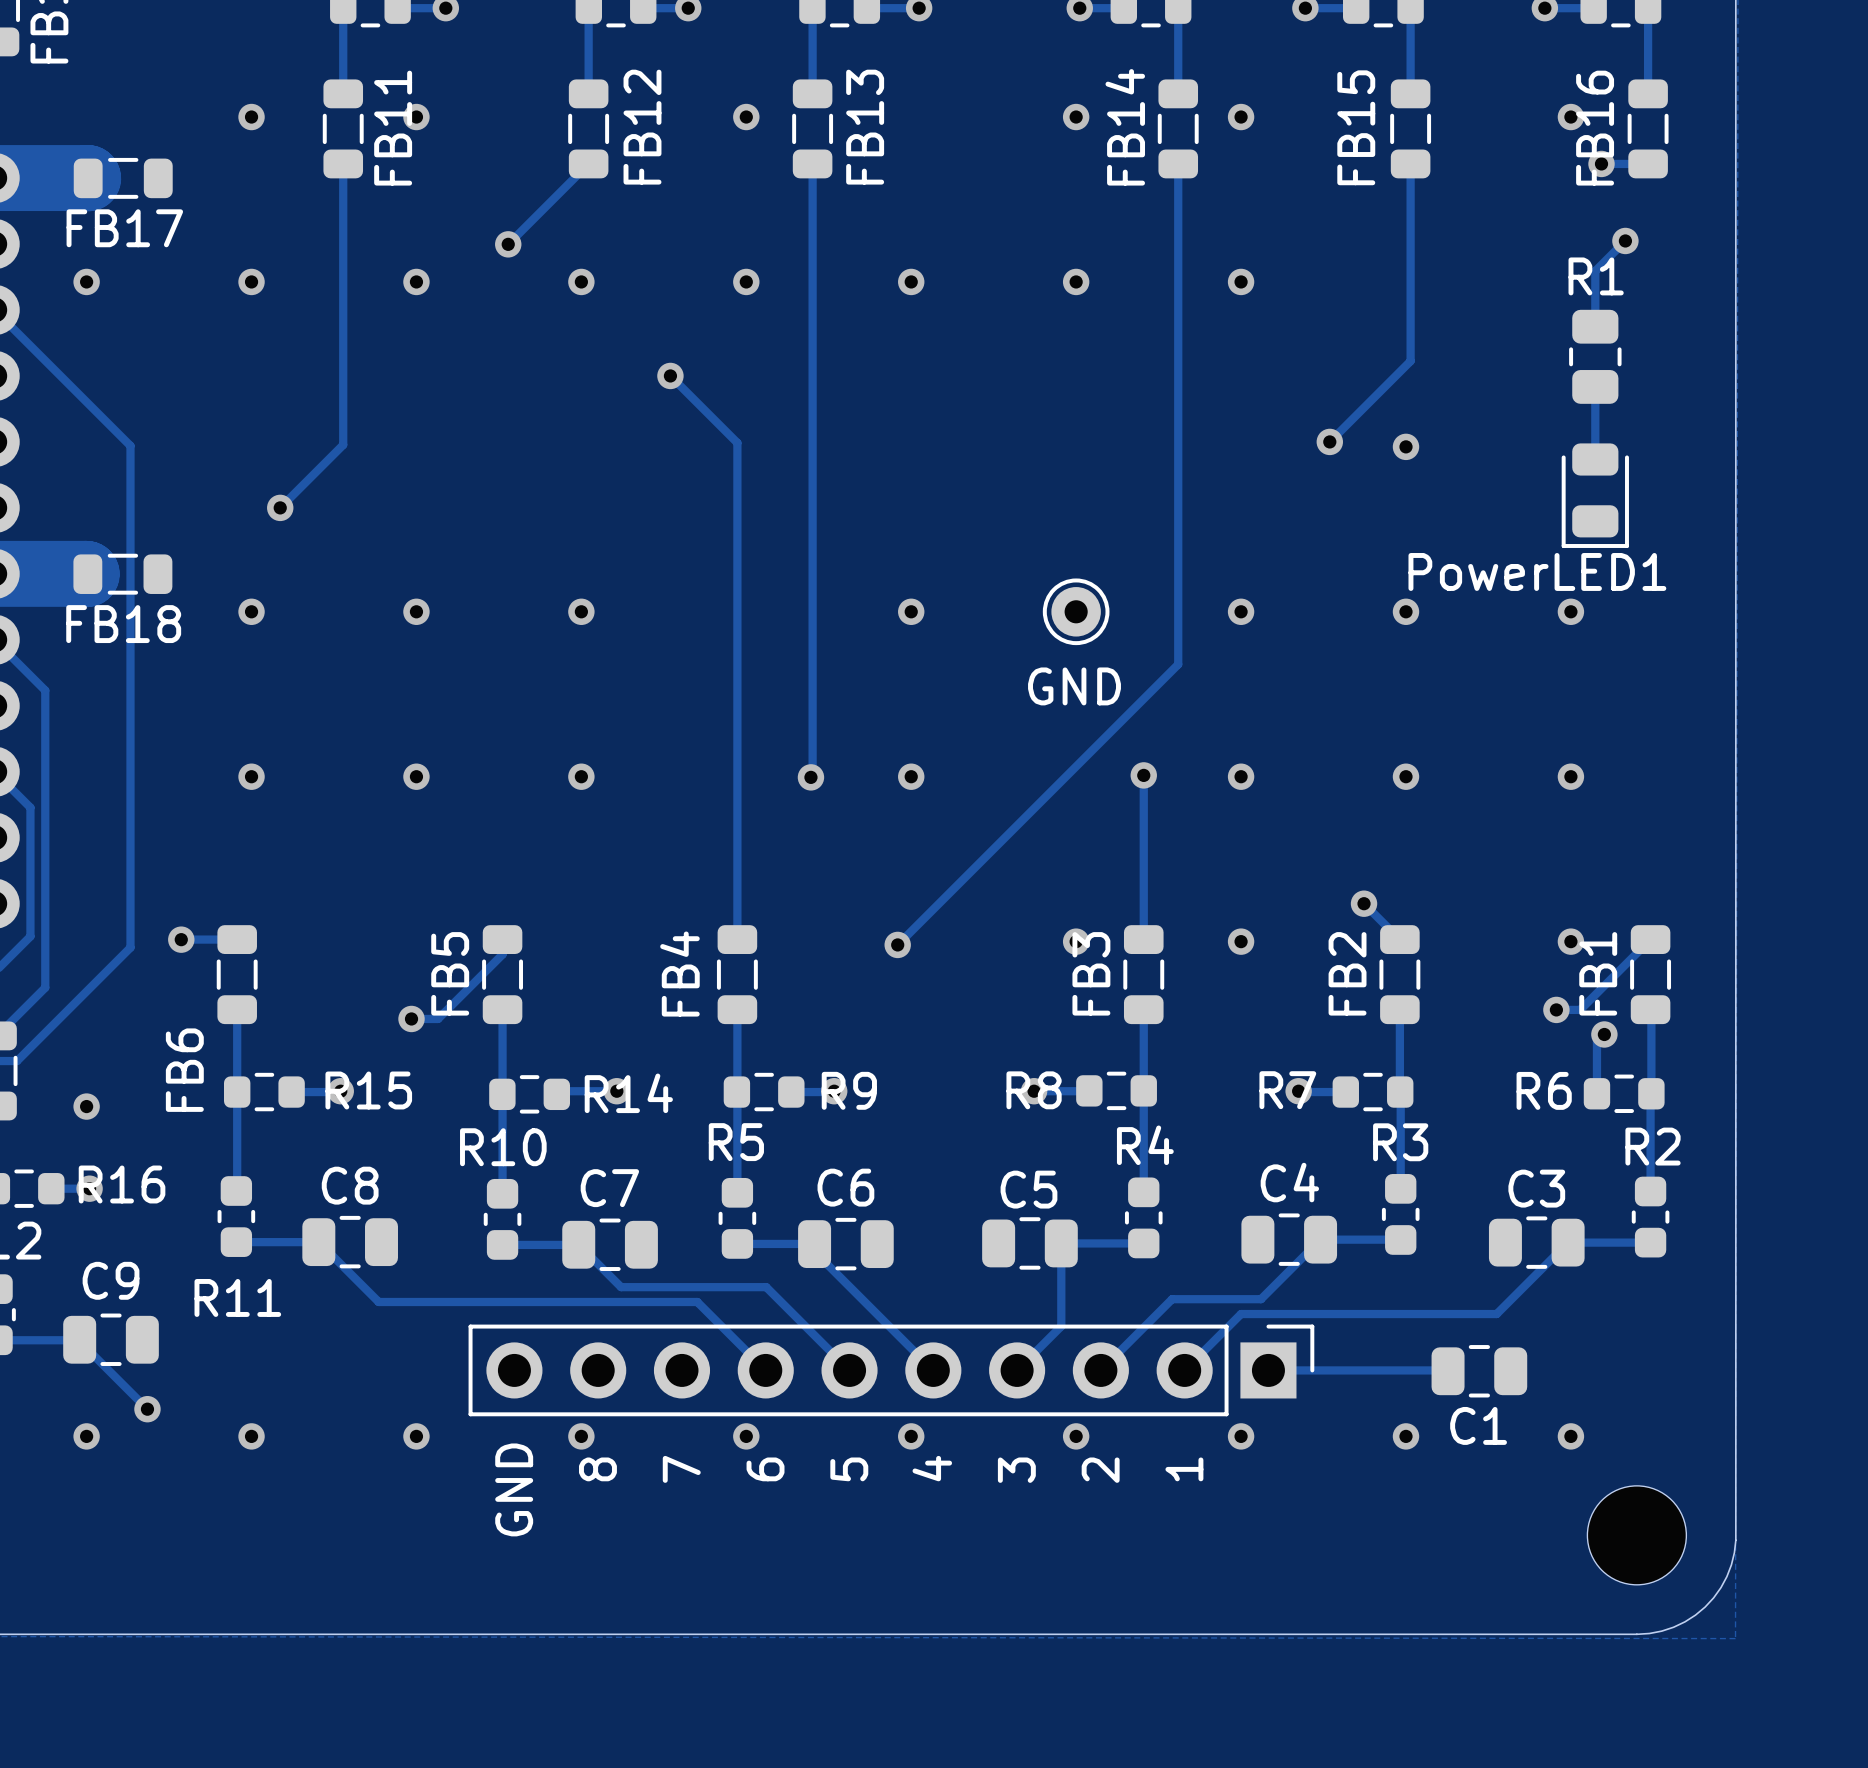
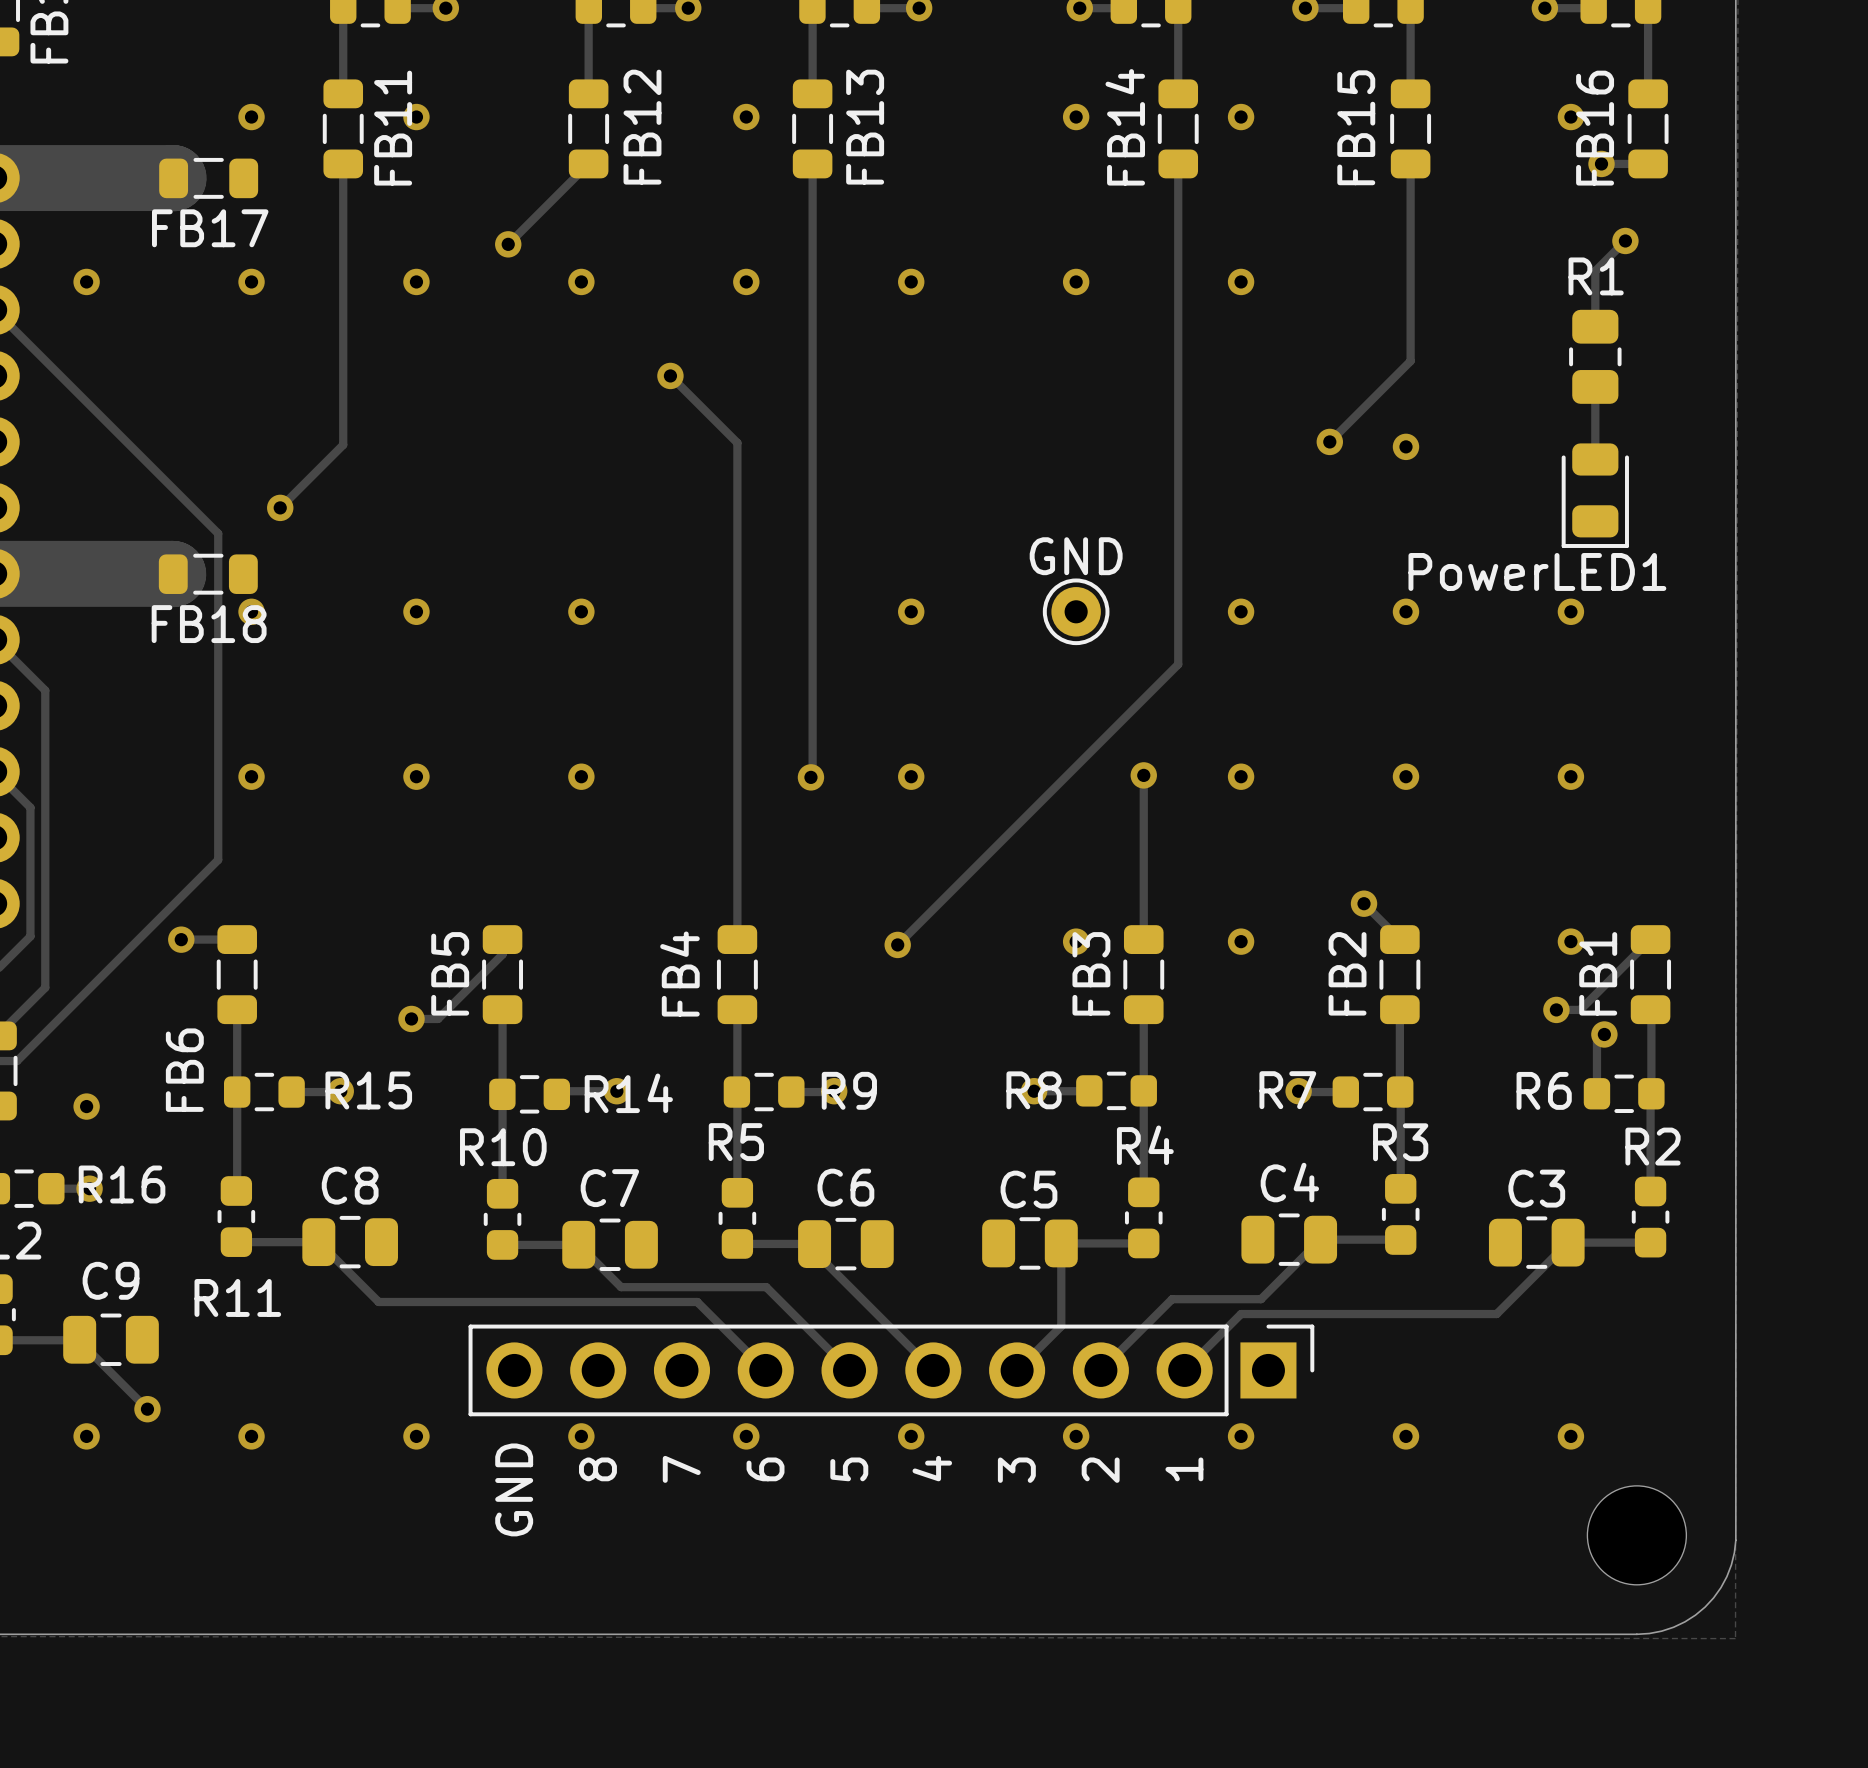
track: none -> (87, 178) (173, 178)
FB17 position: (123, 178) -> (208, 178)
track: (130, 445) (130, 947) -> (130, 445) (218, 533) (218, 859) (130, 947)
track: none -> (86, 573) (172, 573)
FB18 position: (122, 574) -> (208, 574)
GND name position: GND (1074, 686) -> GND (1076, 556)
track: (1268, 1370) (1448, 1371) -> none
C1: (1479, 1371) -> none

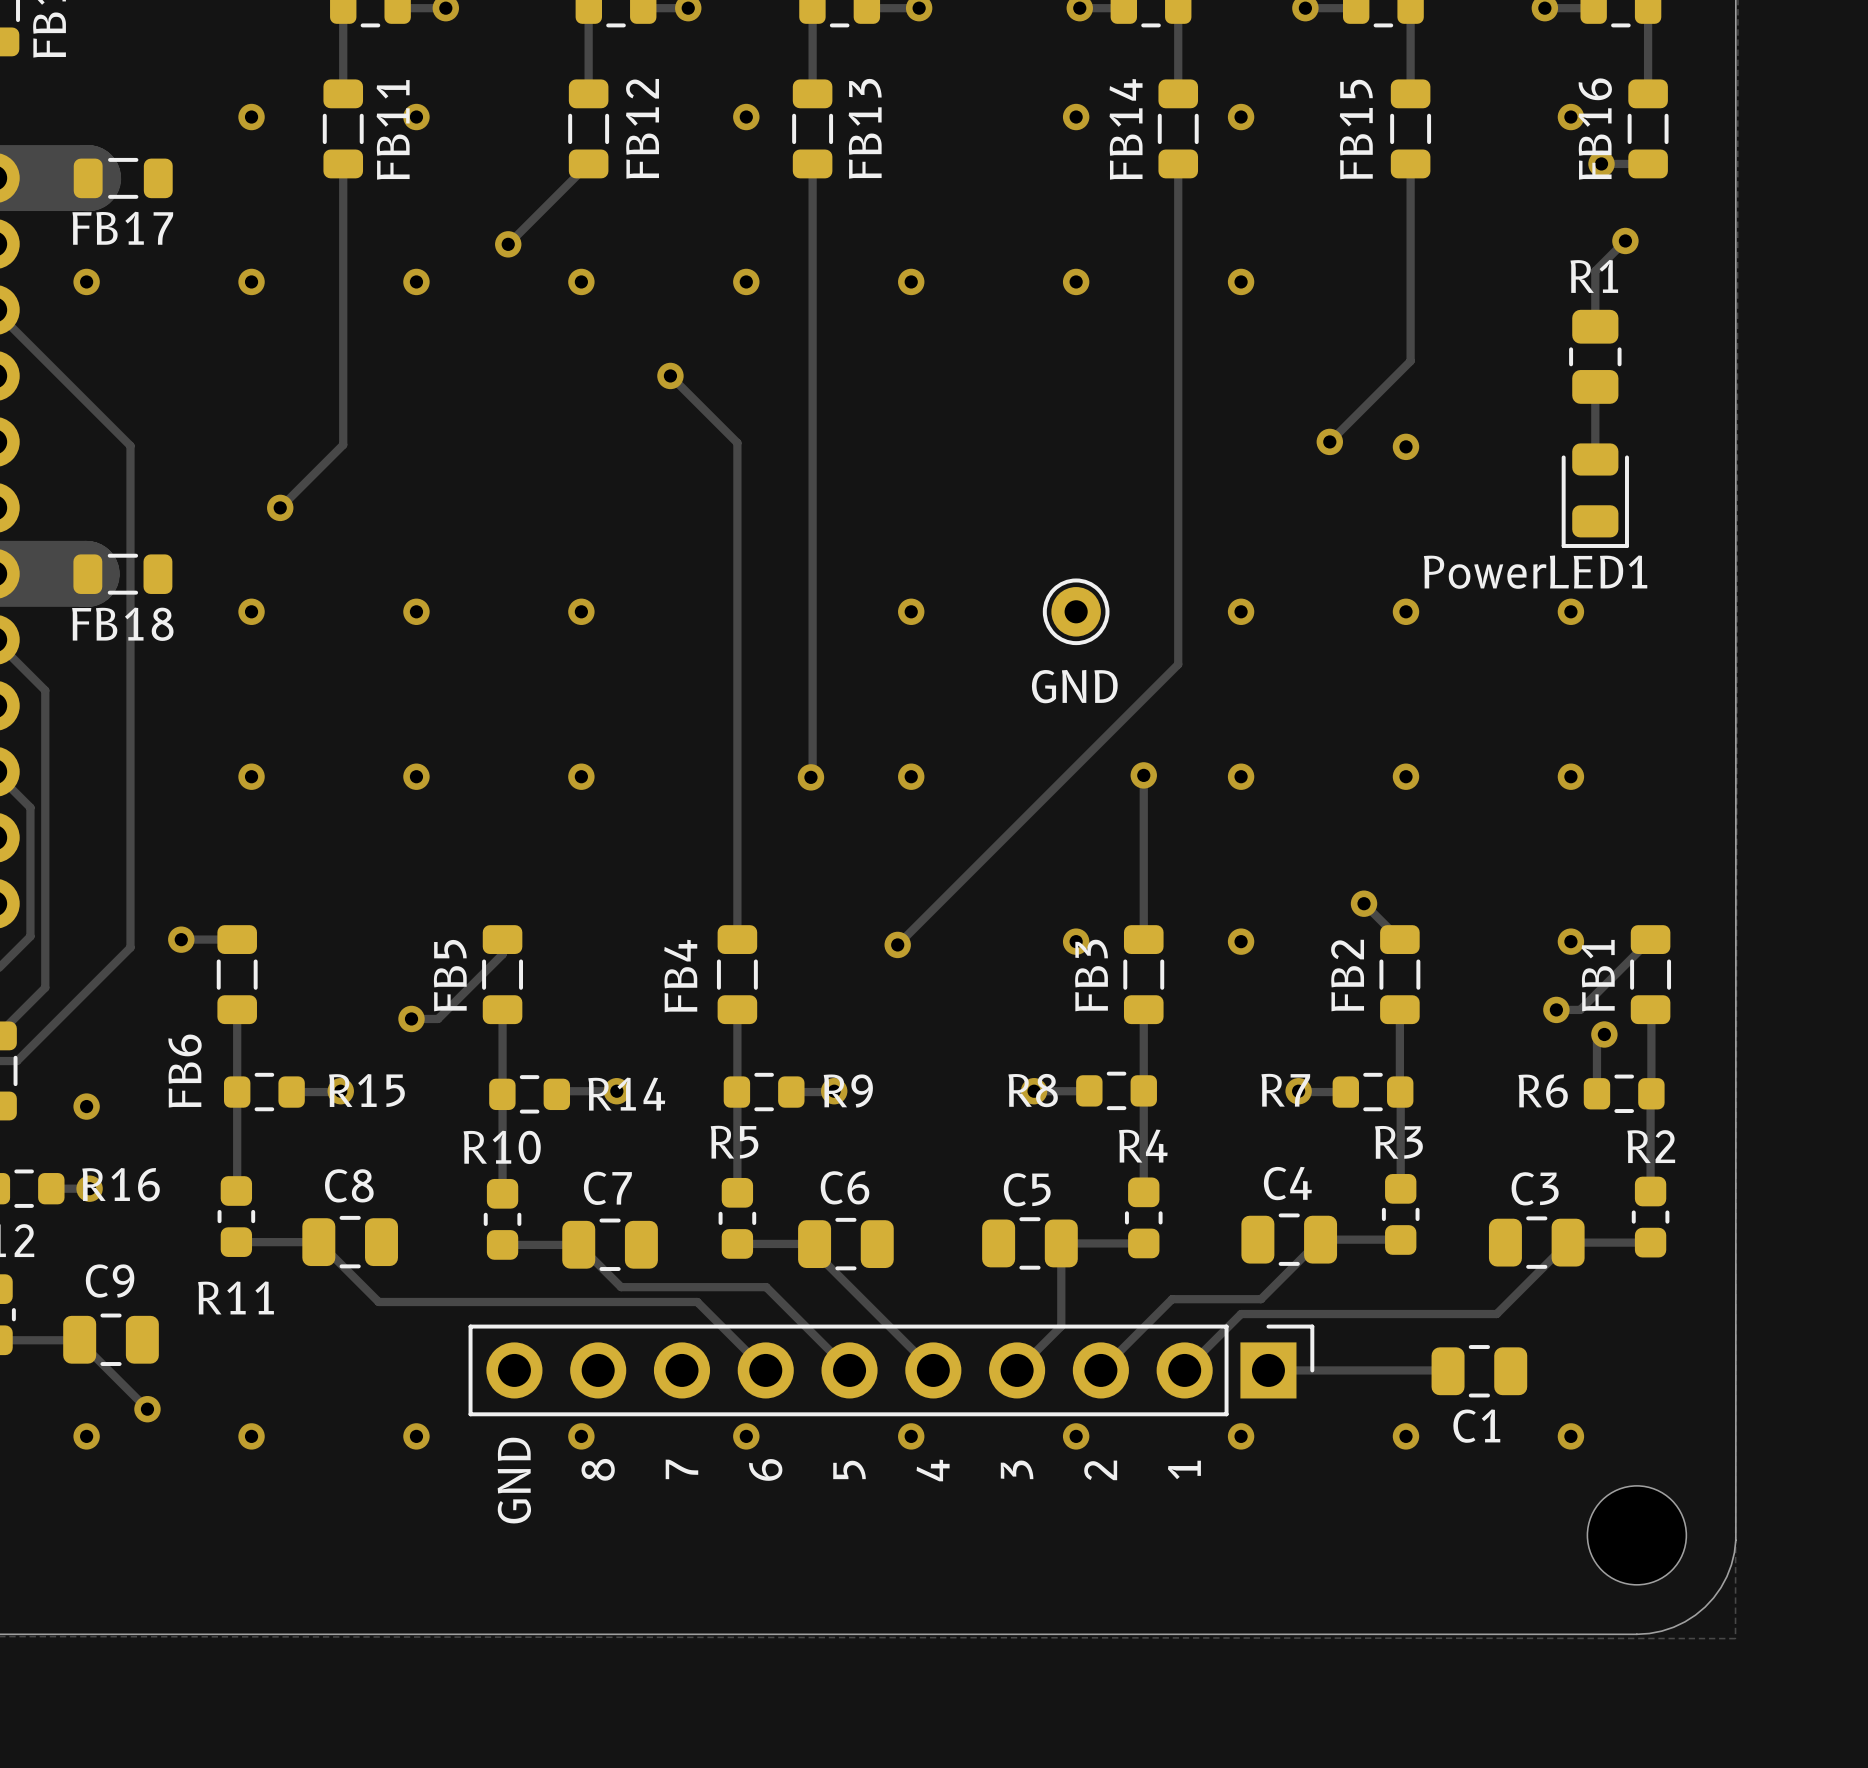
track: (87, 178) (173, 178) -> none
FB17 position: (208, 178) -> (123, 178)
track: (130, 445) (218, 533) (218, 859) (130, 947) -> (130, 445) (130, 947)
GND name position: GND (1076, 556) -> GND (1074, 686)
track: (86, 573) (172, 573) -> none
FB18 position: (208, 574) -> (122, 574)
track: none -> (1268, 1370) (1448, 1371)
C1: none -> (1479, 1371)

